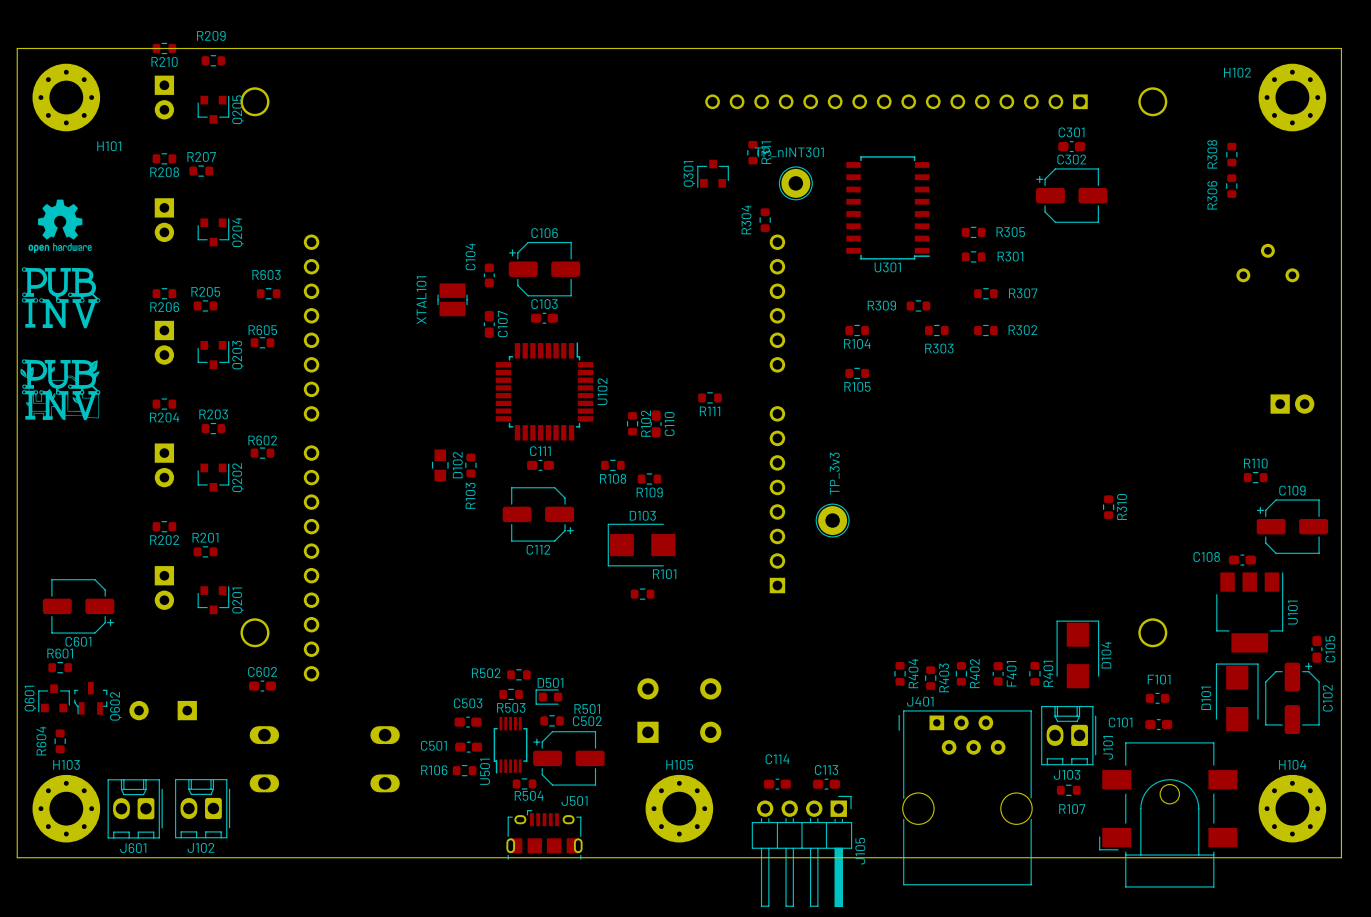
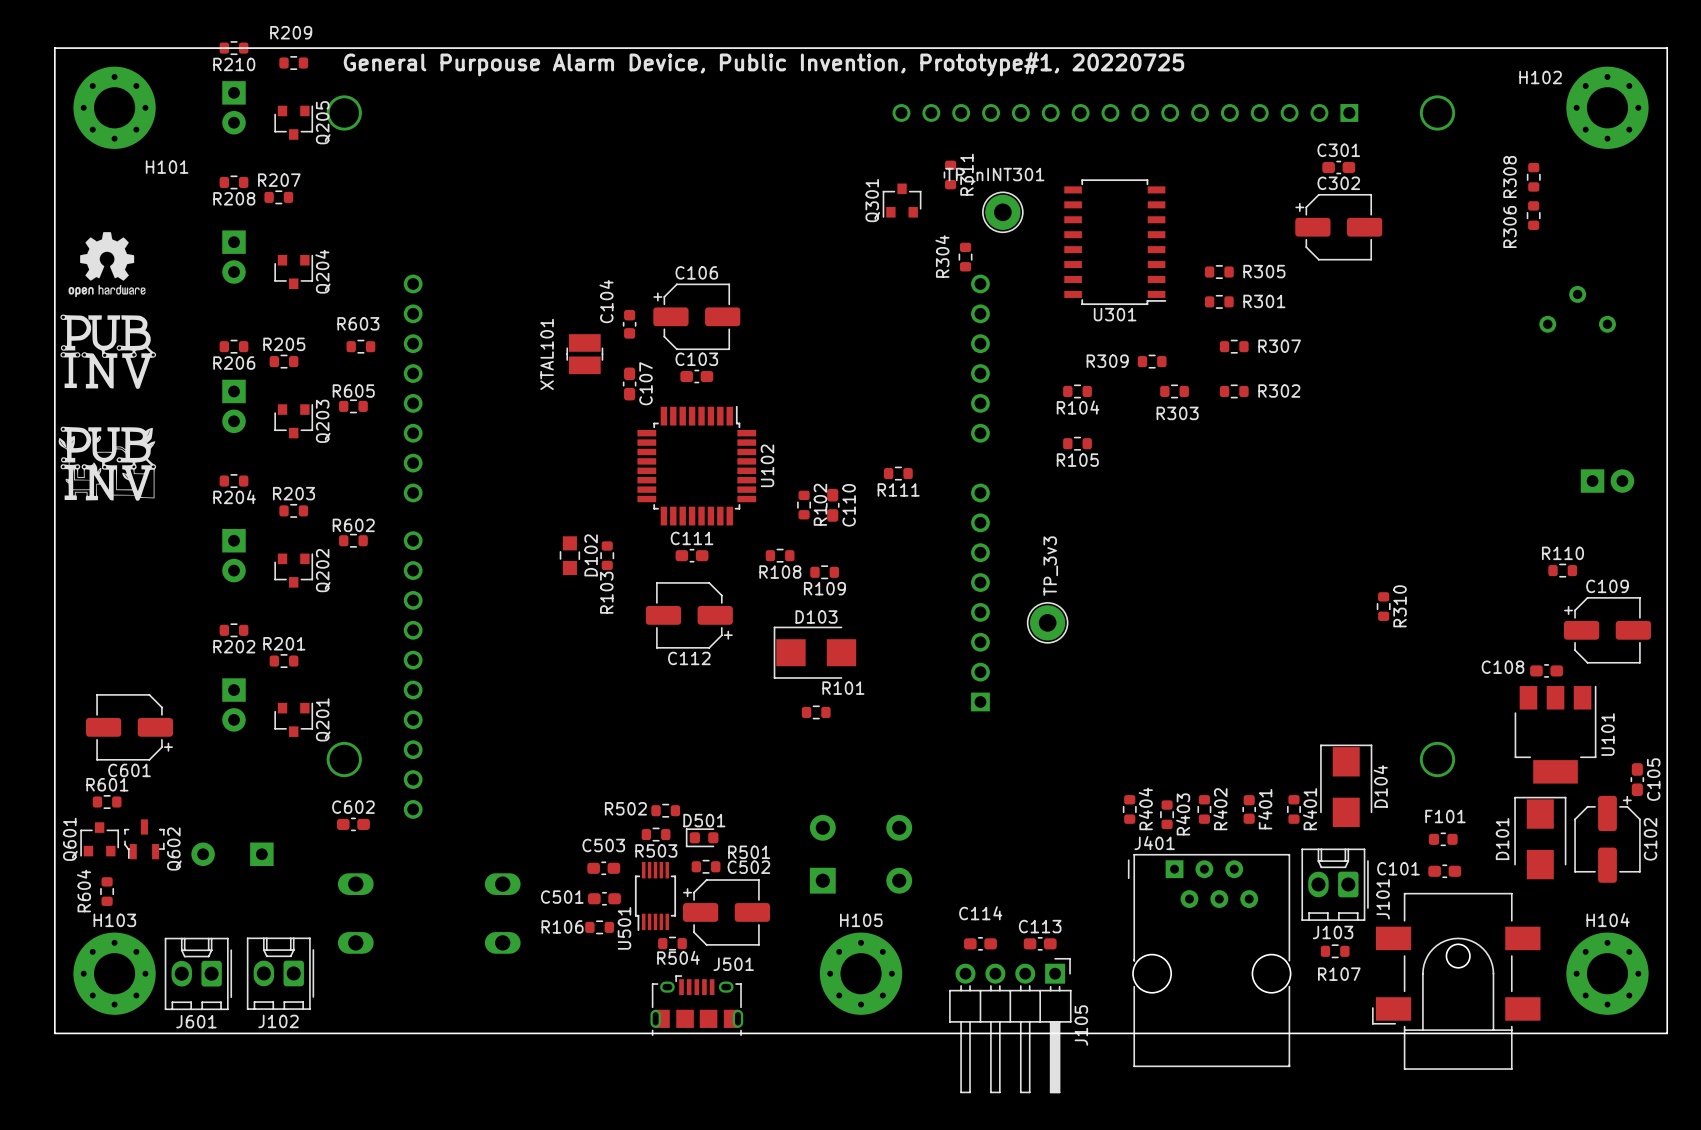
text: none -> General Purpouse Alarm Device, Public Invention, Prototype#1, 20220725 (763, 64)

